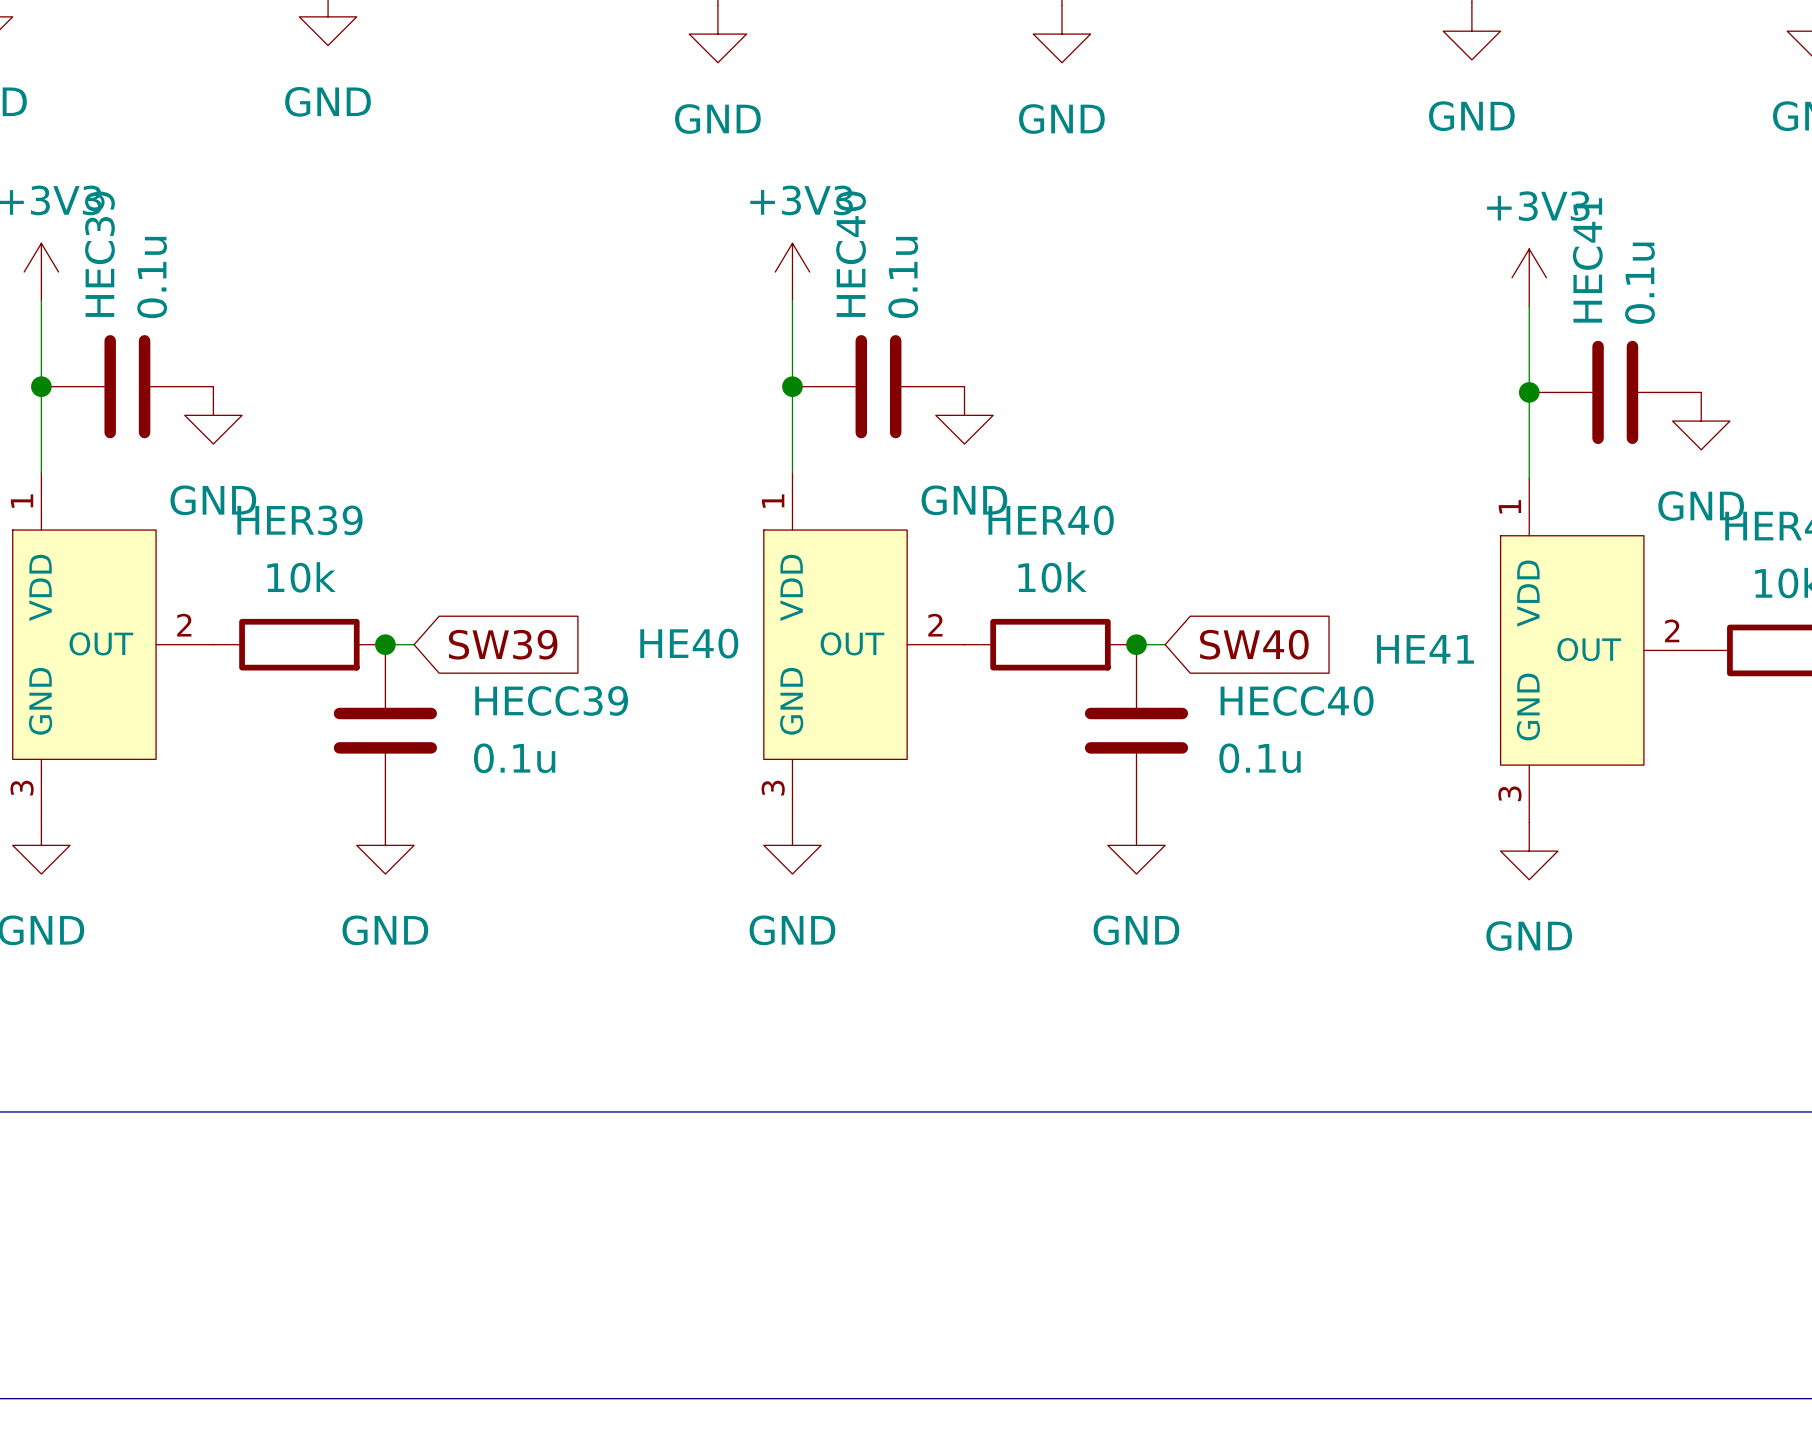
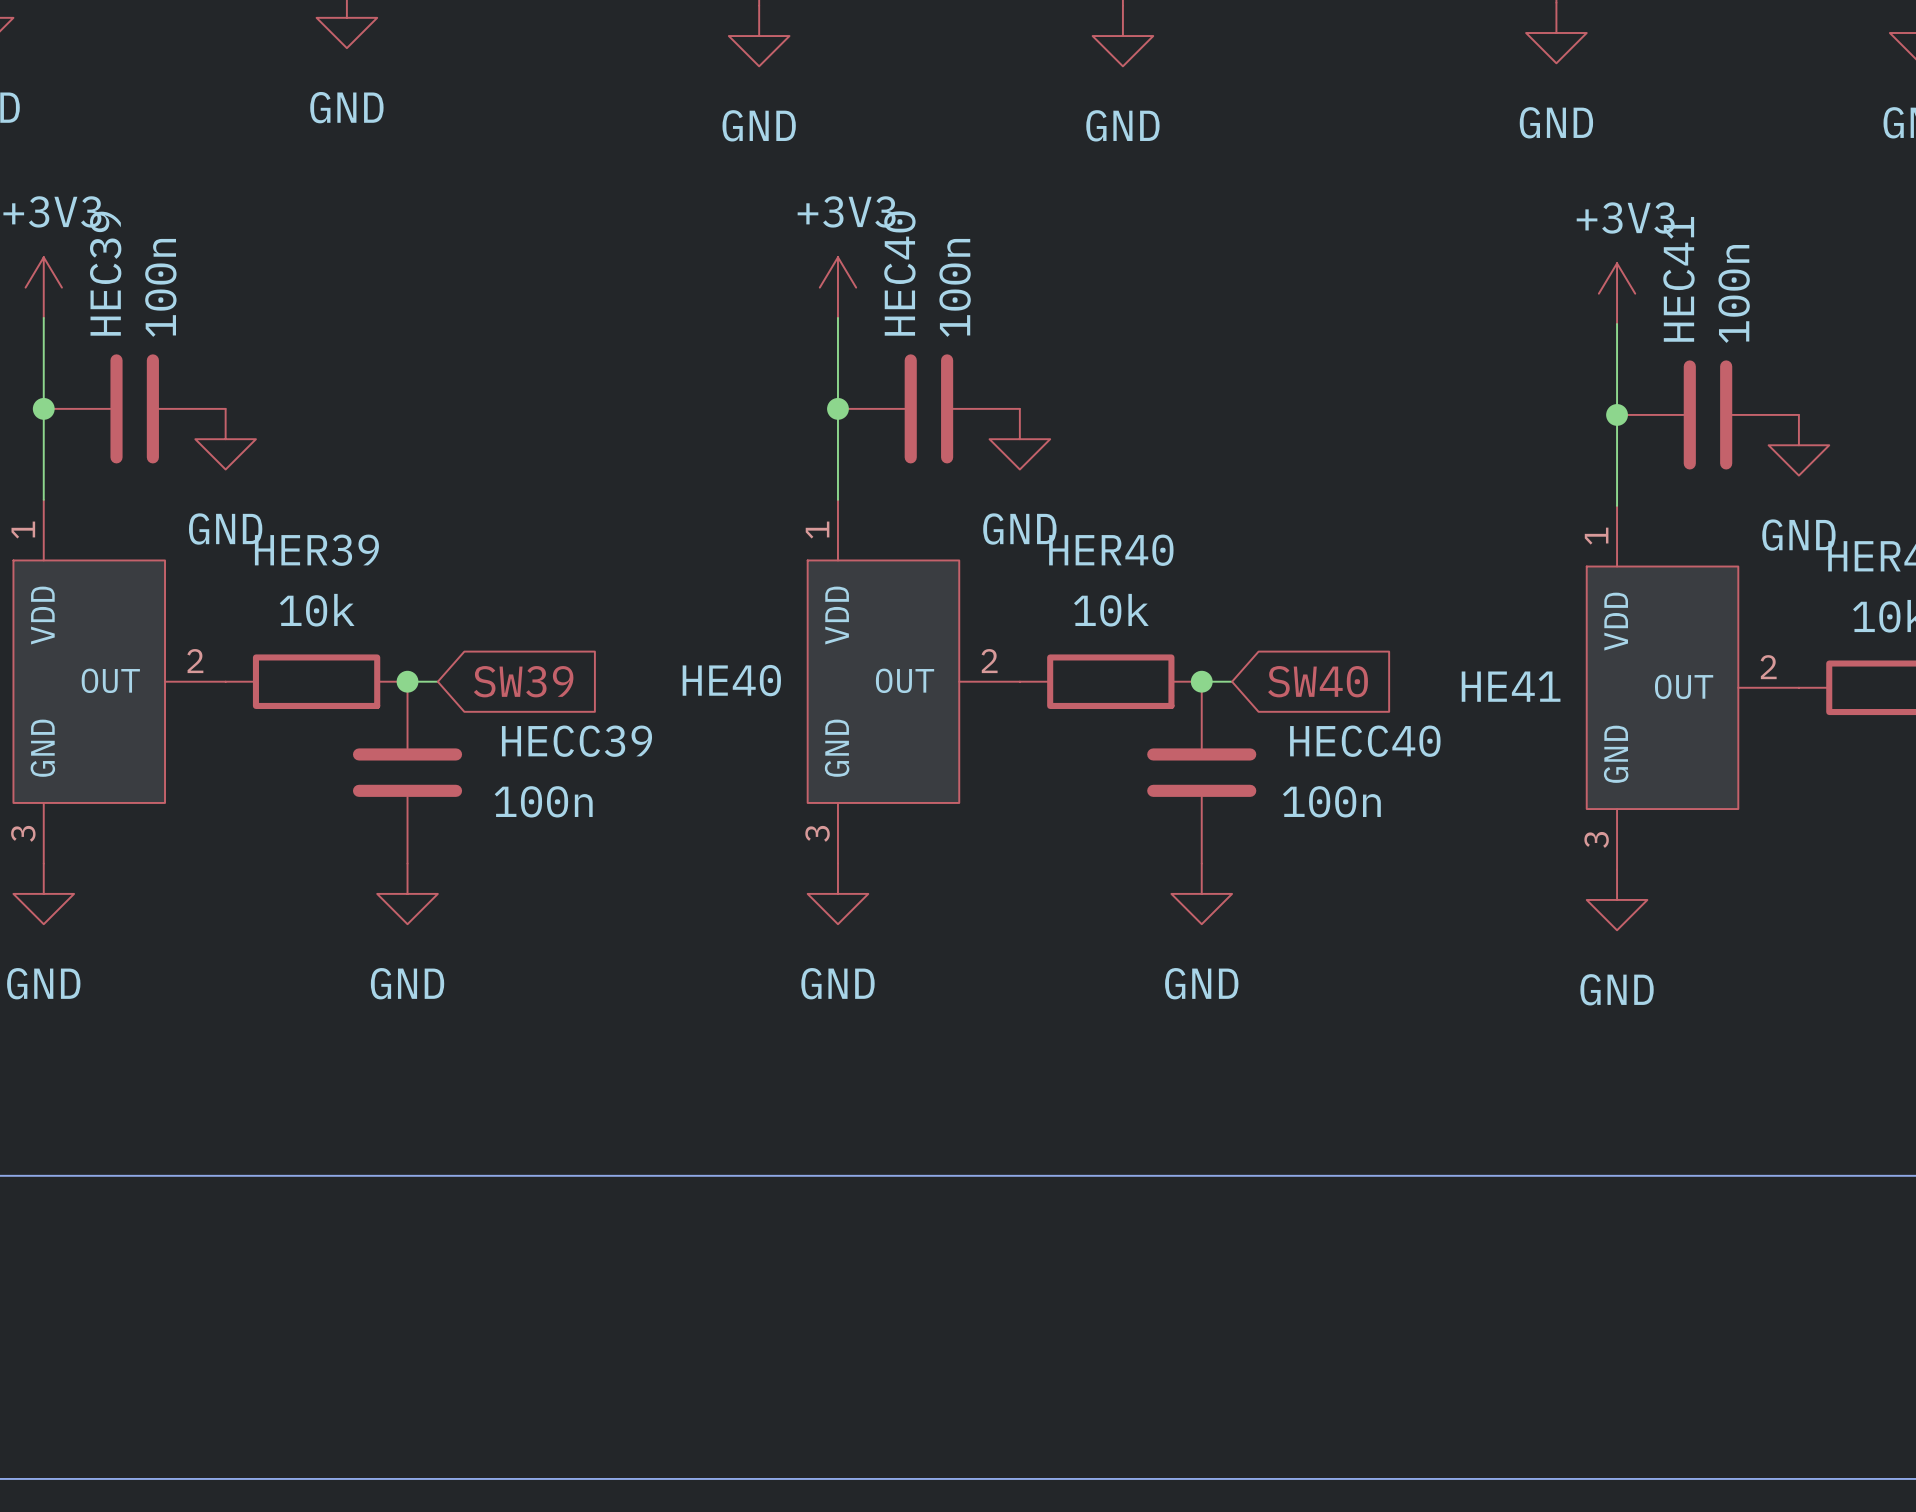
HEC39 value: 0.1u (152, 277) -> 100n (160, 287)
HEC40 value: 0.1u (903, 277) -> 100n (955, 287)
HEC41 value: 0.1u (1640, 283) -> 100n (1734, 293)
HECC39 value: 0.1u (514, 758) -> 100n (543, 801)
HECC40 value: 0.1u (1260, 758) -> 100n (1331, 801)

